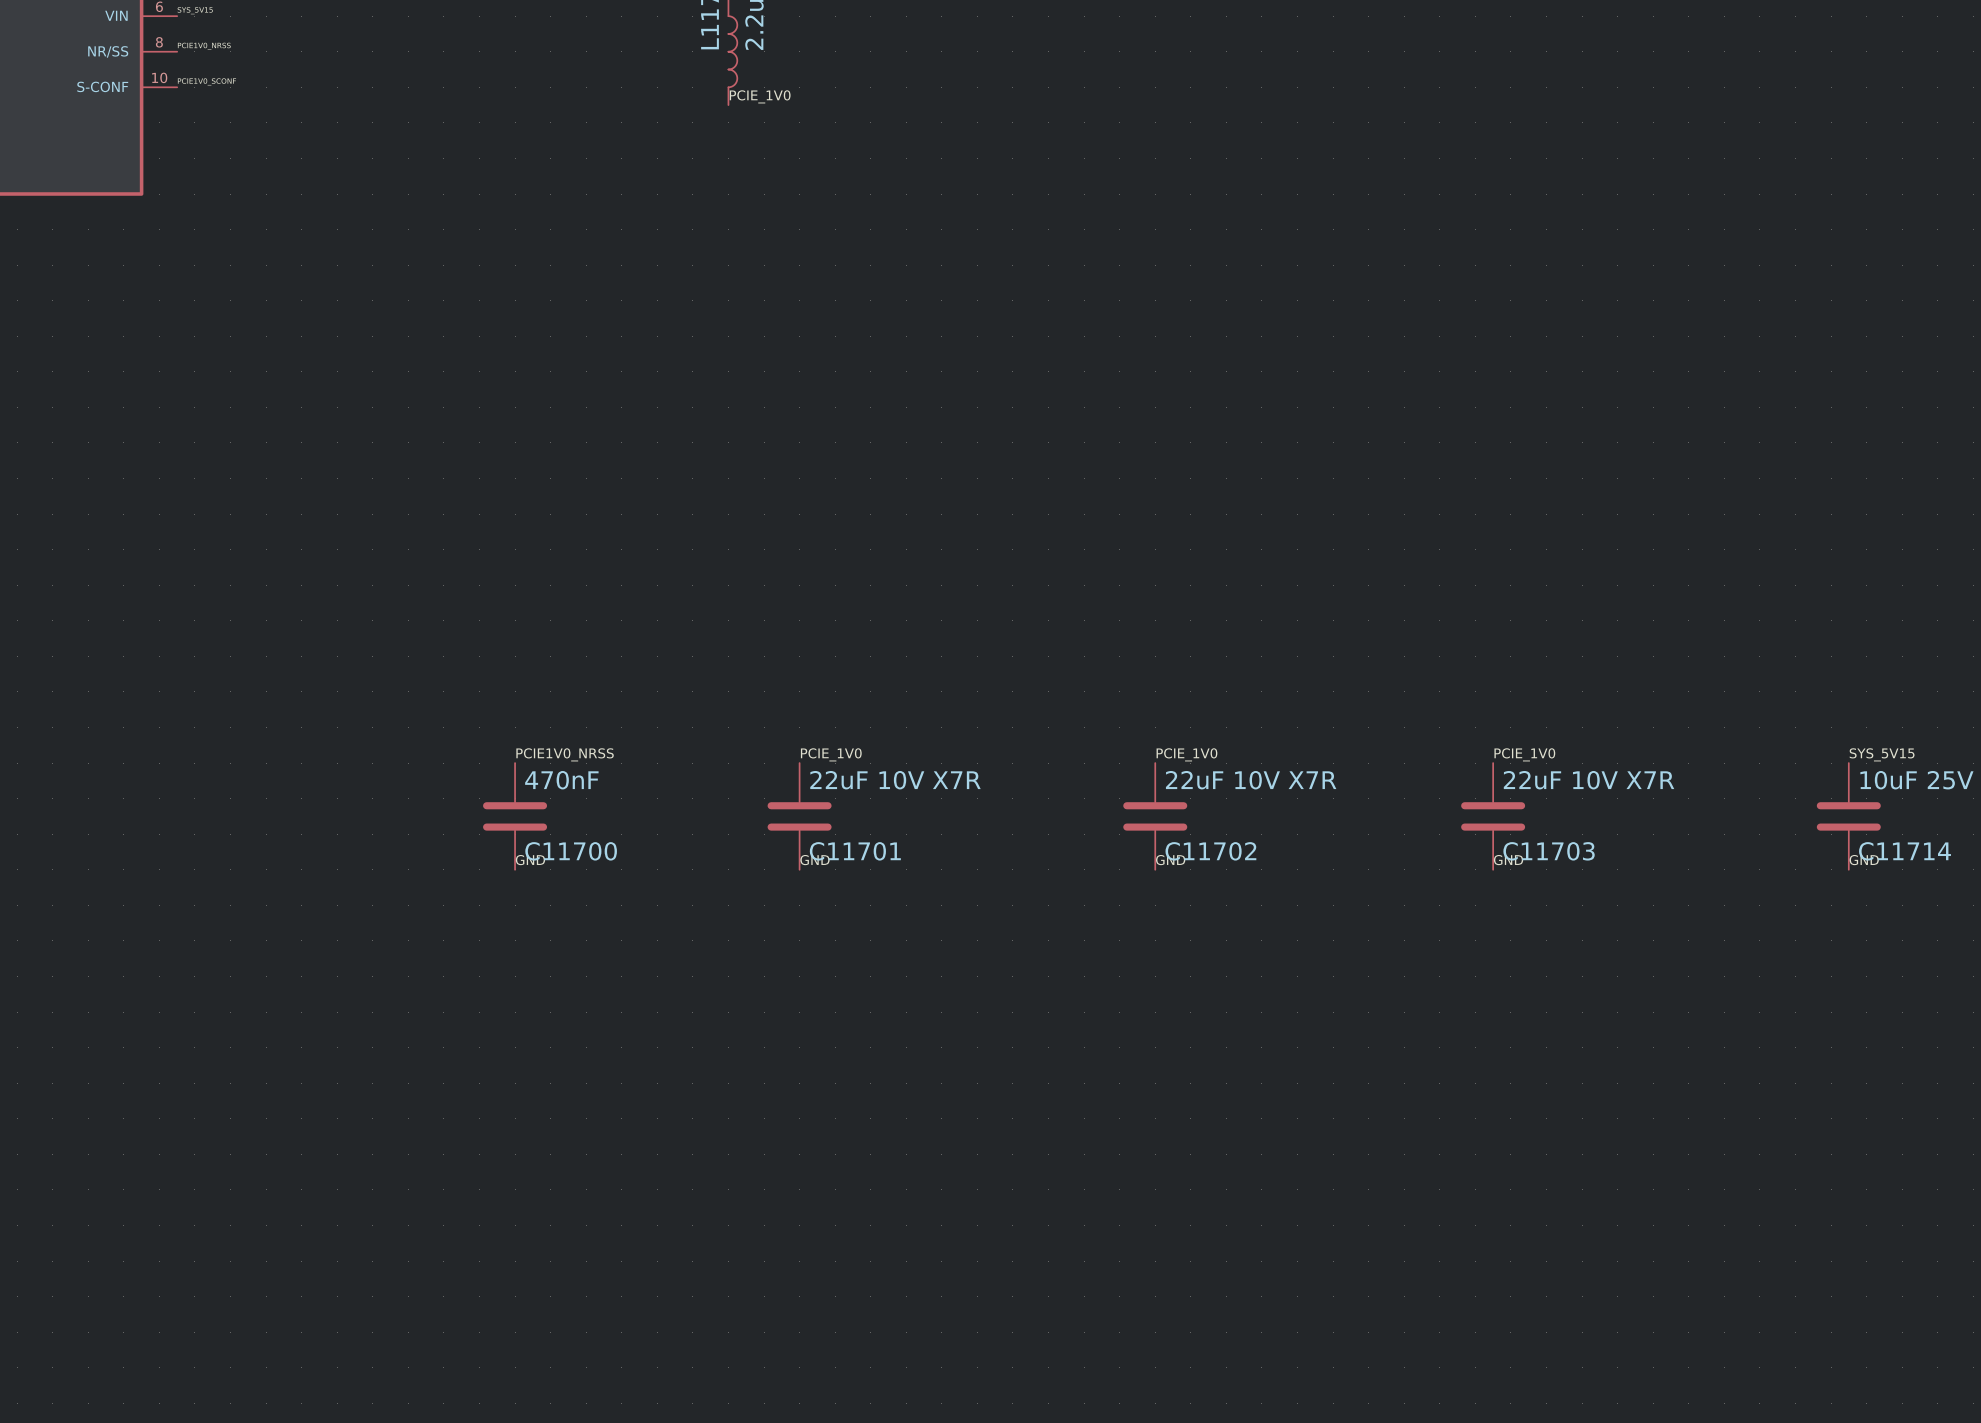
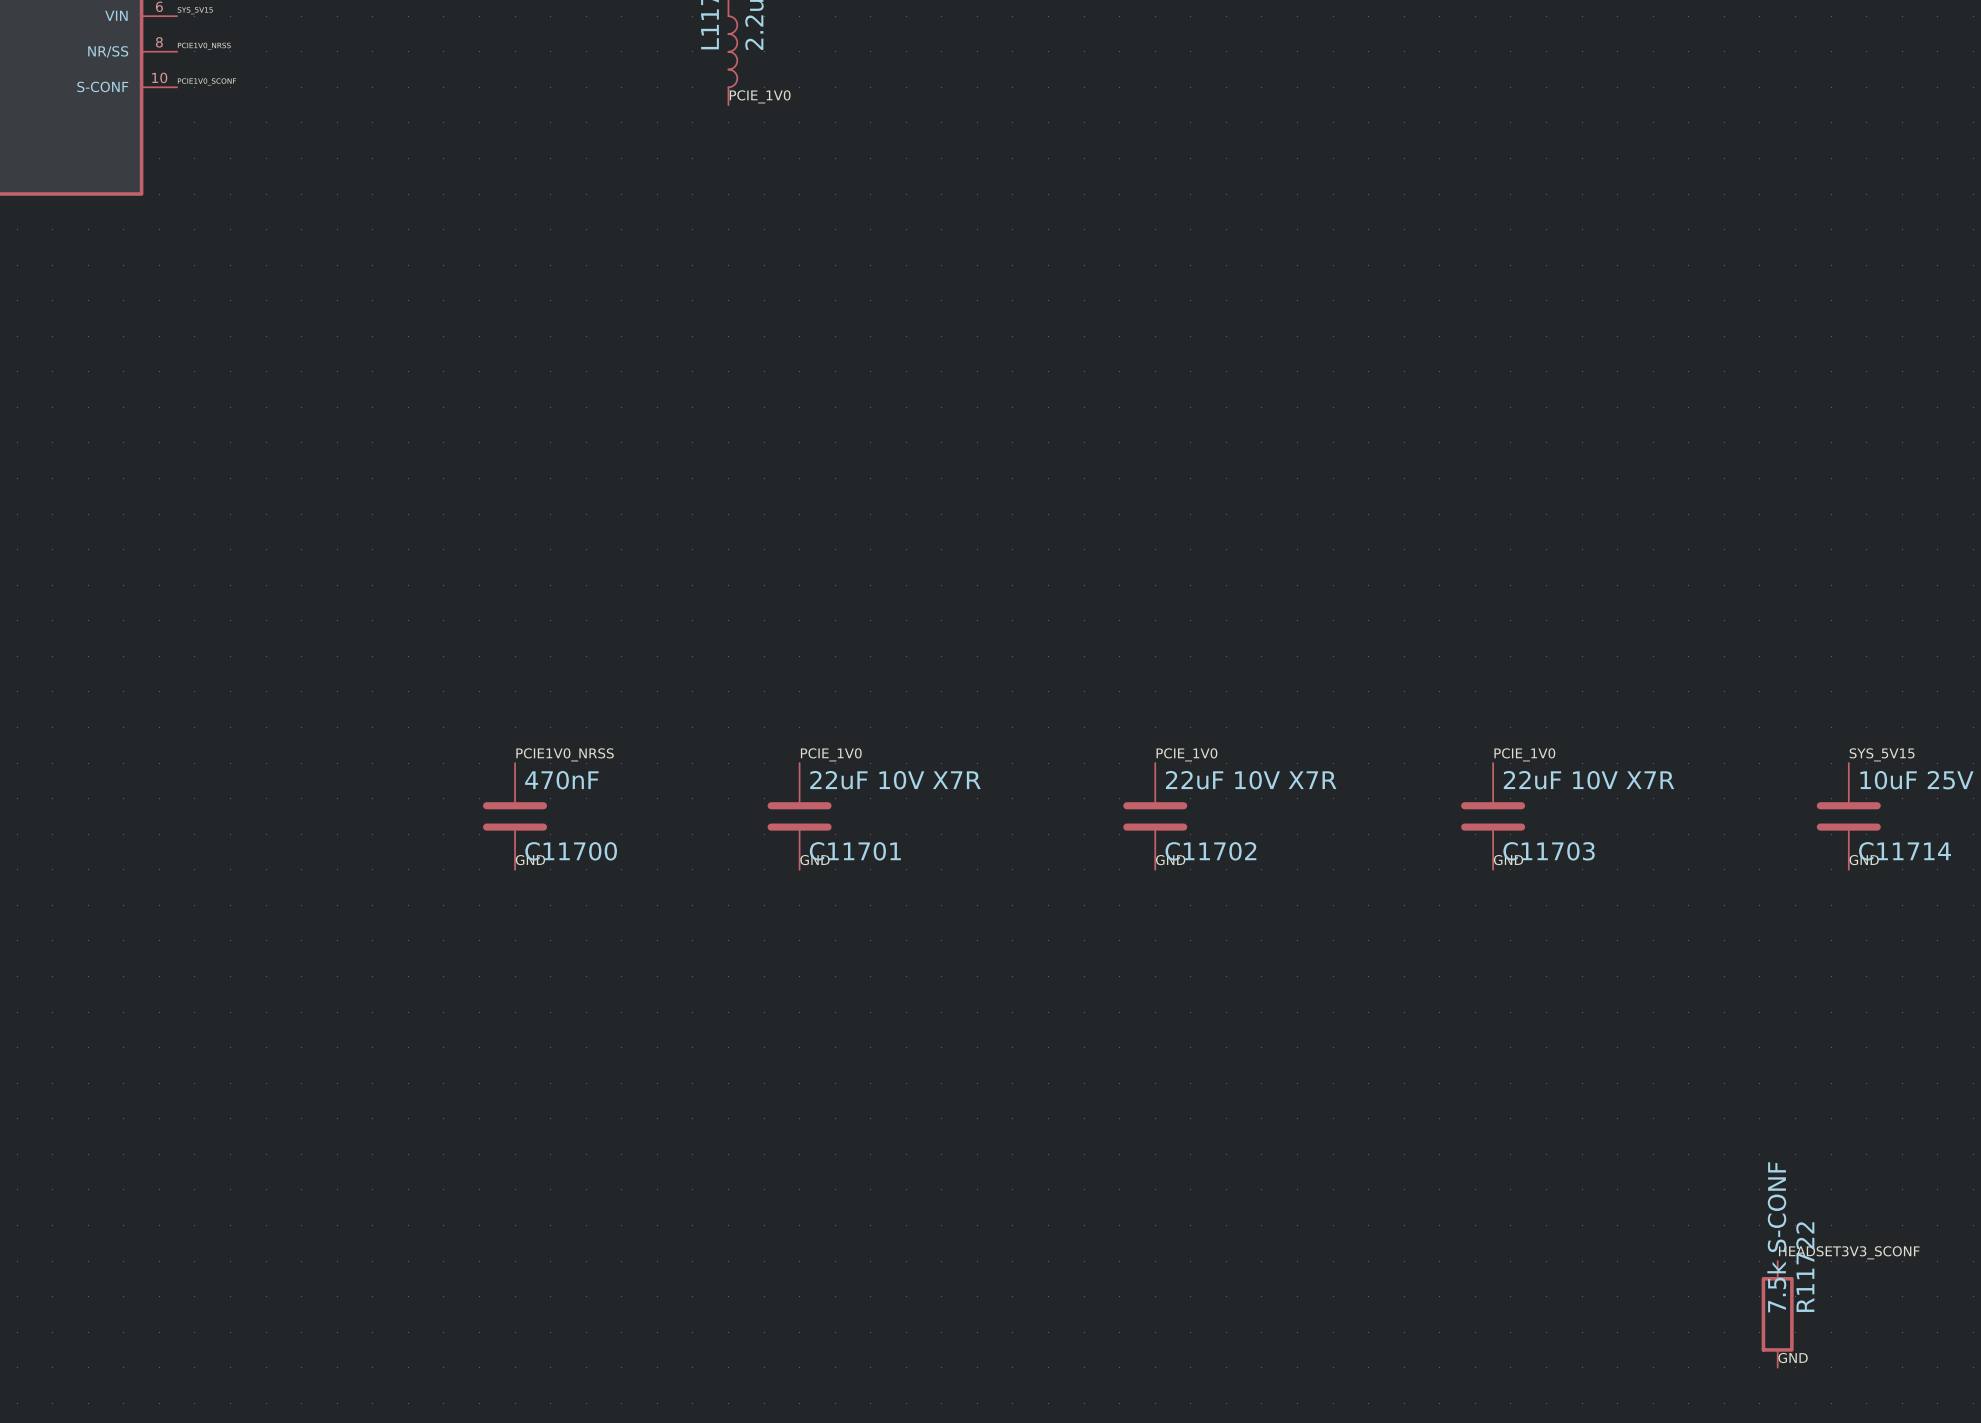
label: none -> HEADSET3V3_SCONF (1849, 1252)
R11722: none -> 7.5k S-CONF (1777, 1314)
label: none -> GND (1793, 1358)

